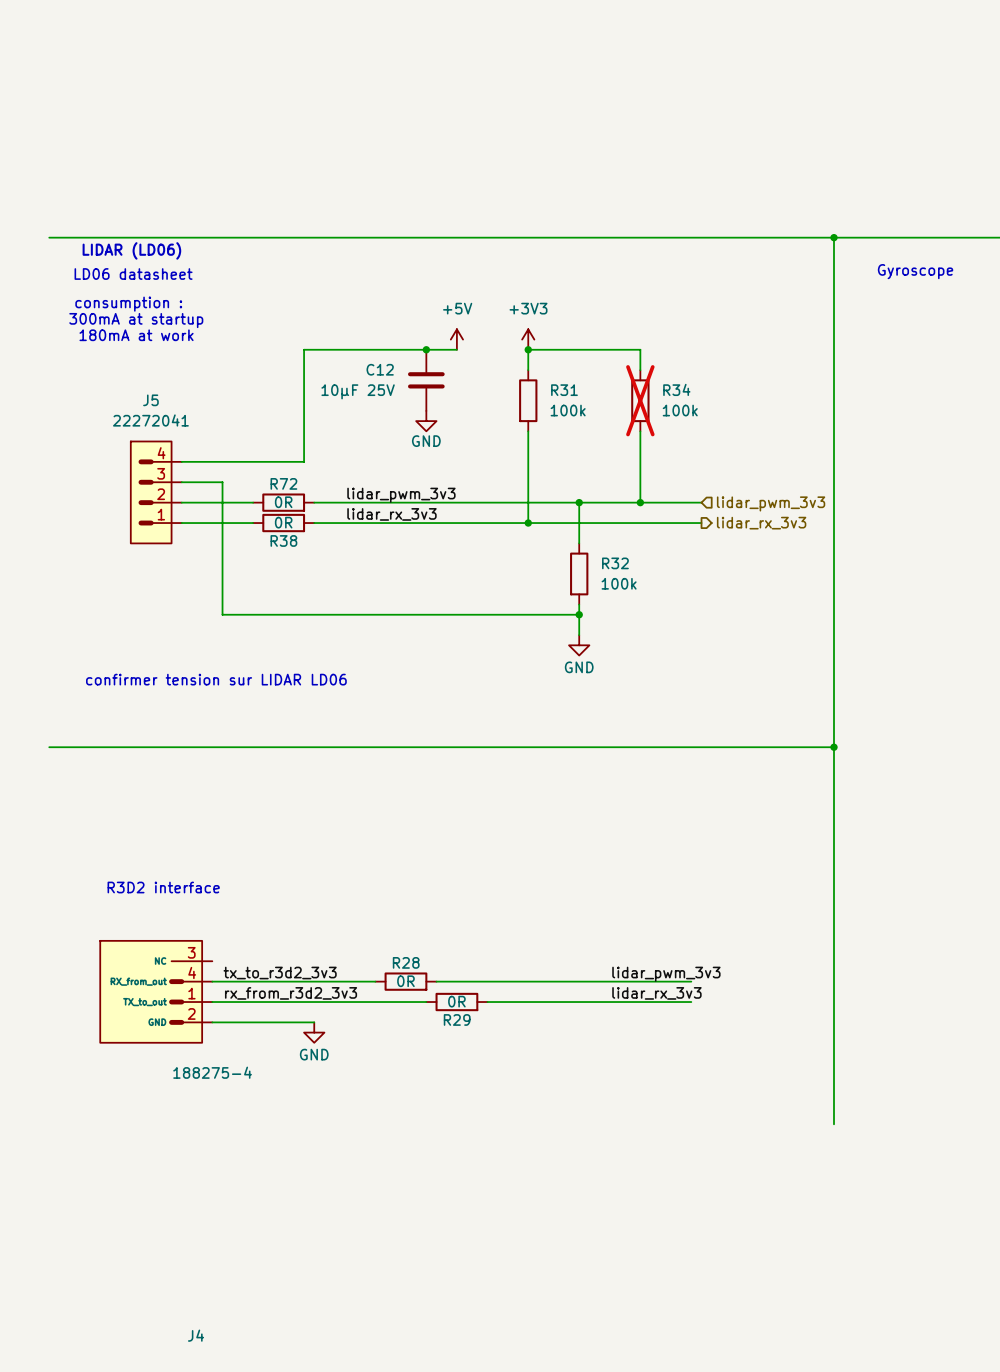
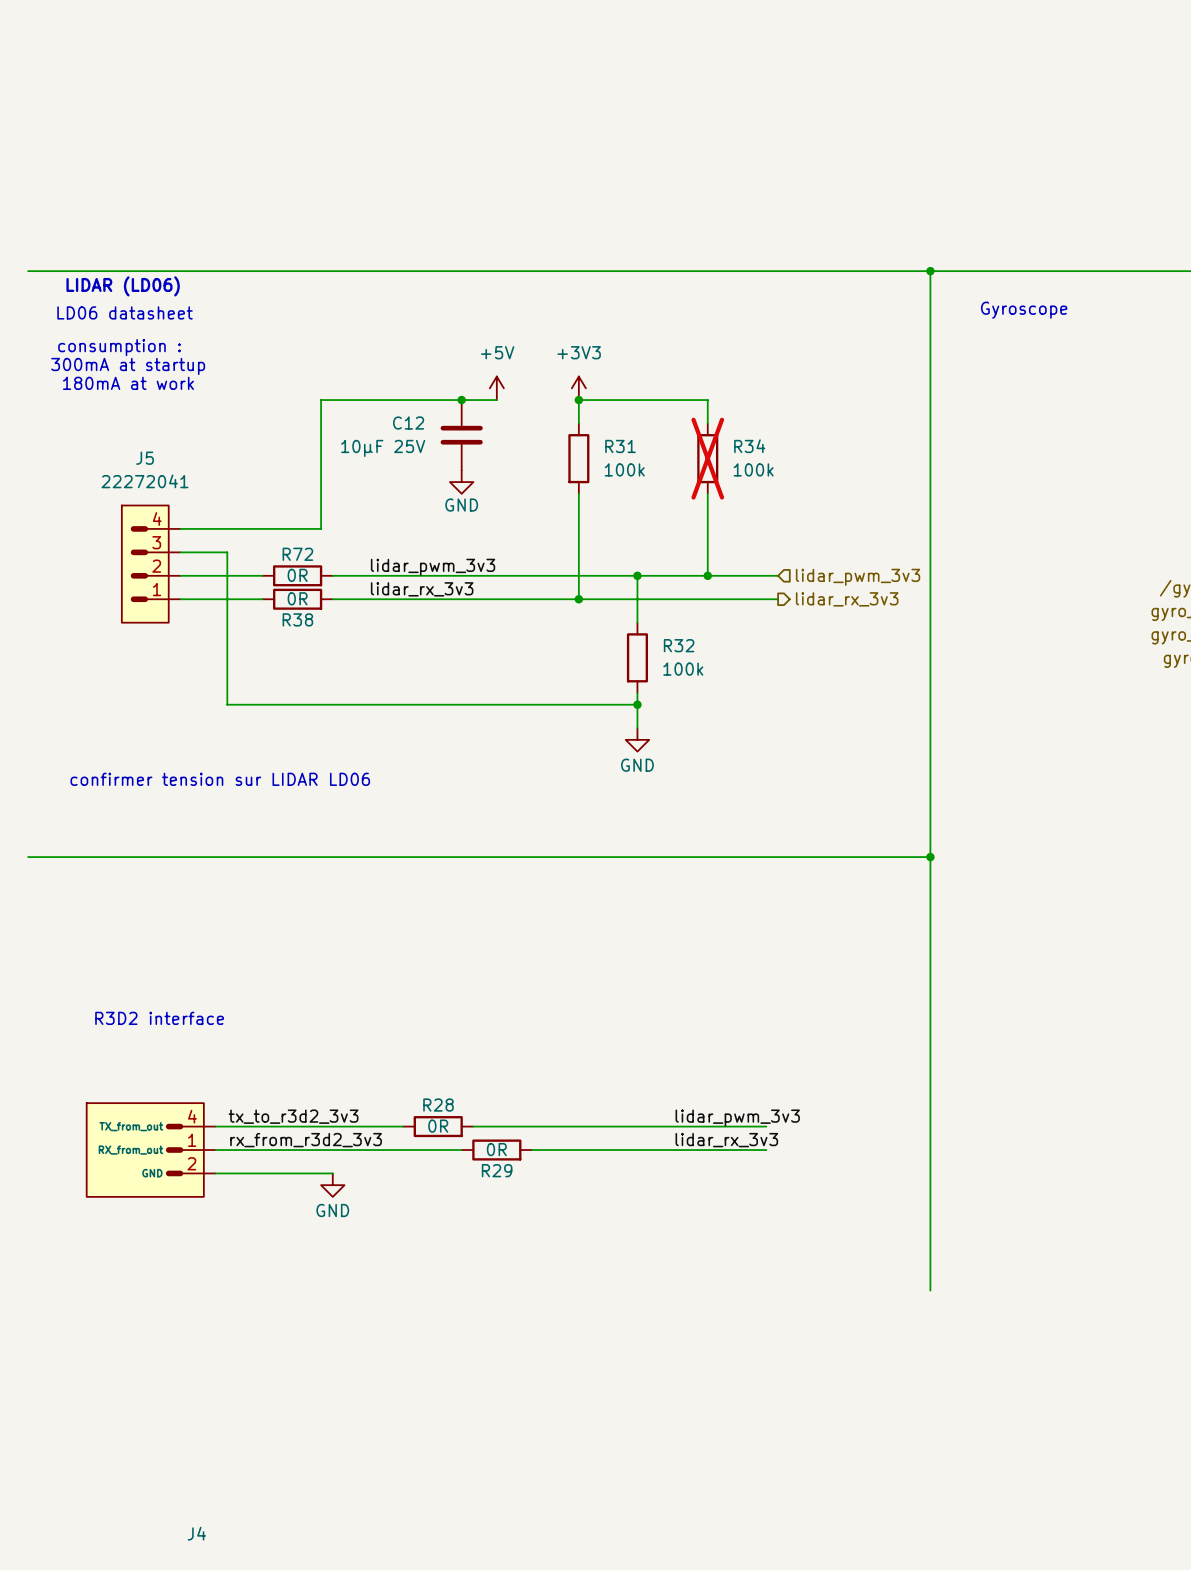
J4 symbol: [100, 940, 213, 1043] -> [86, 1103, 216, 1197]
J4 value: 188275-4 (212, 1072) -> none

